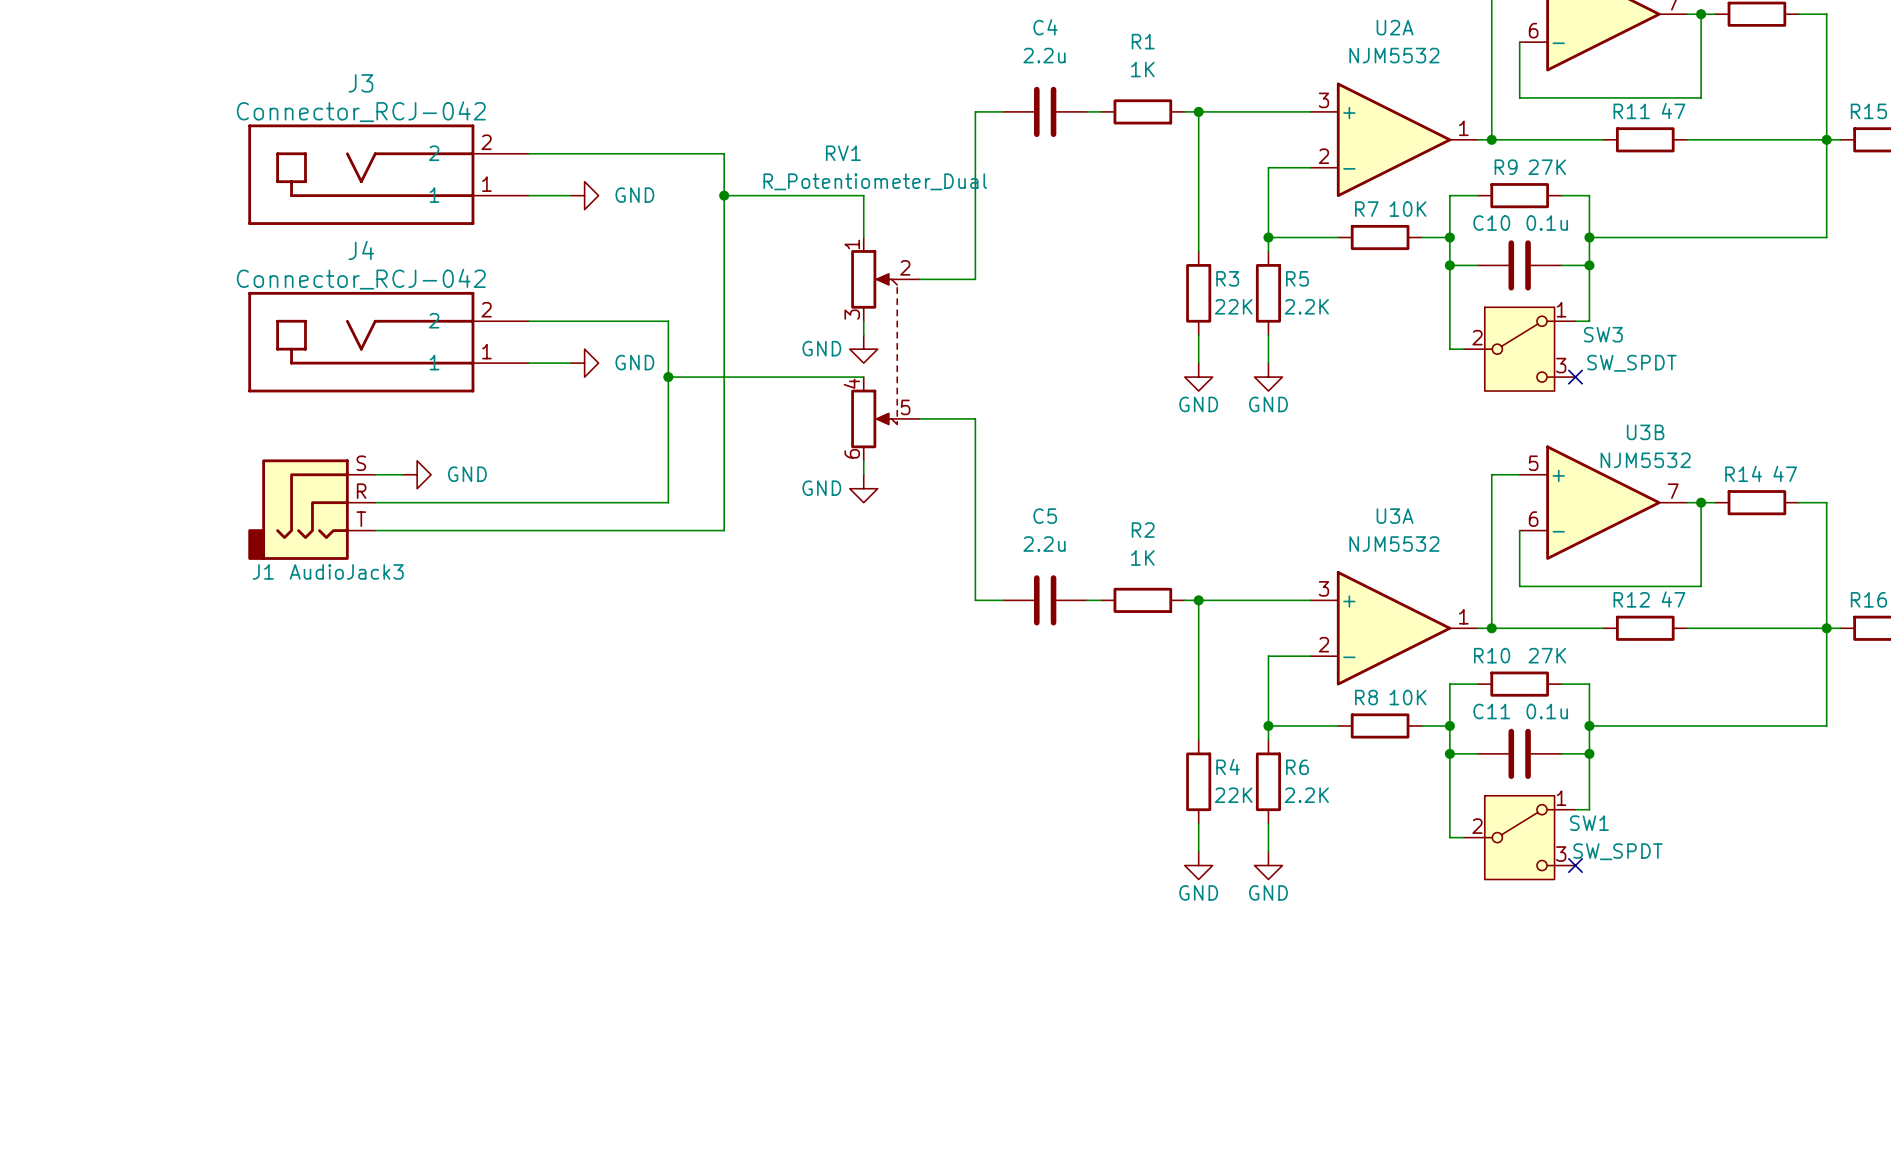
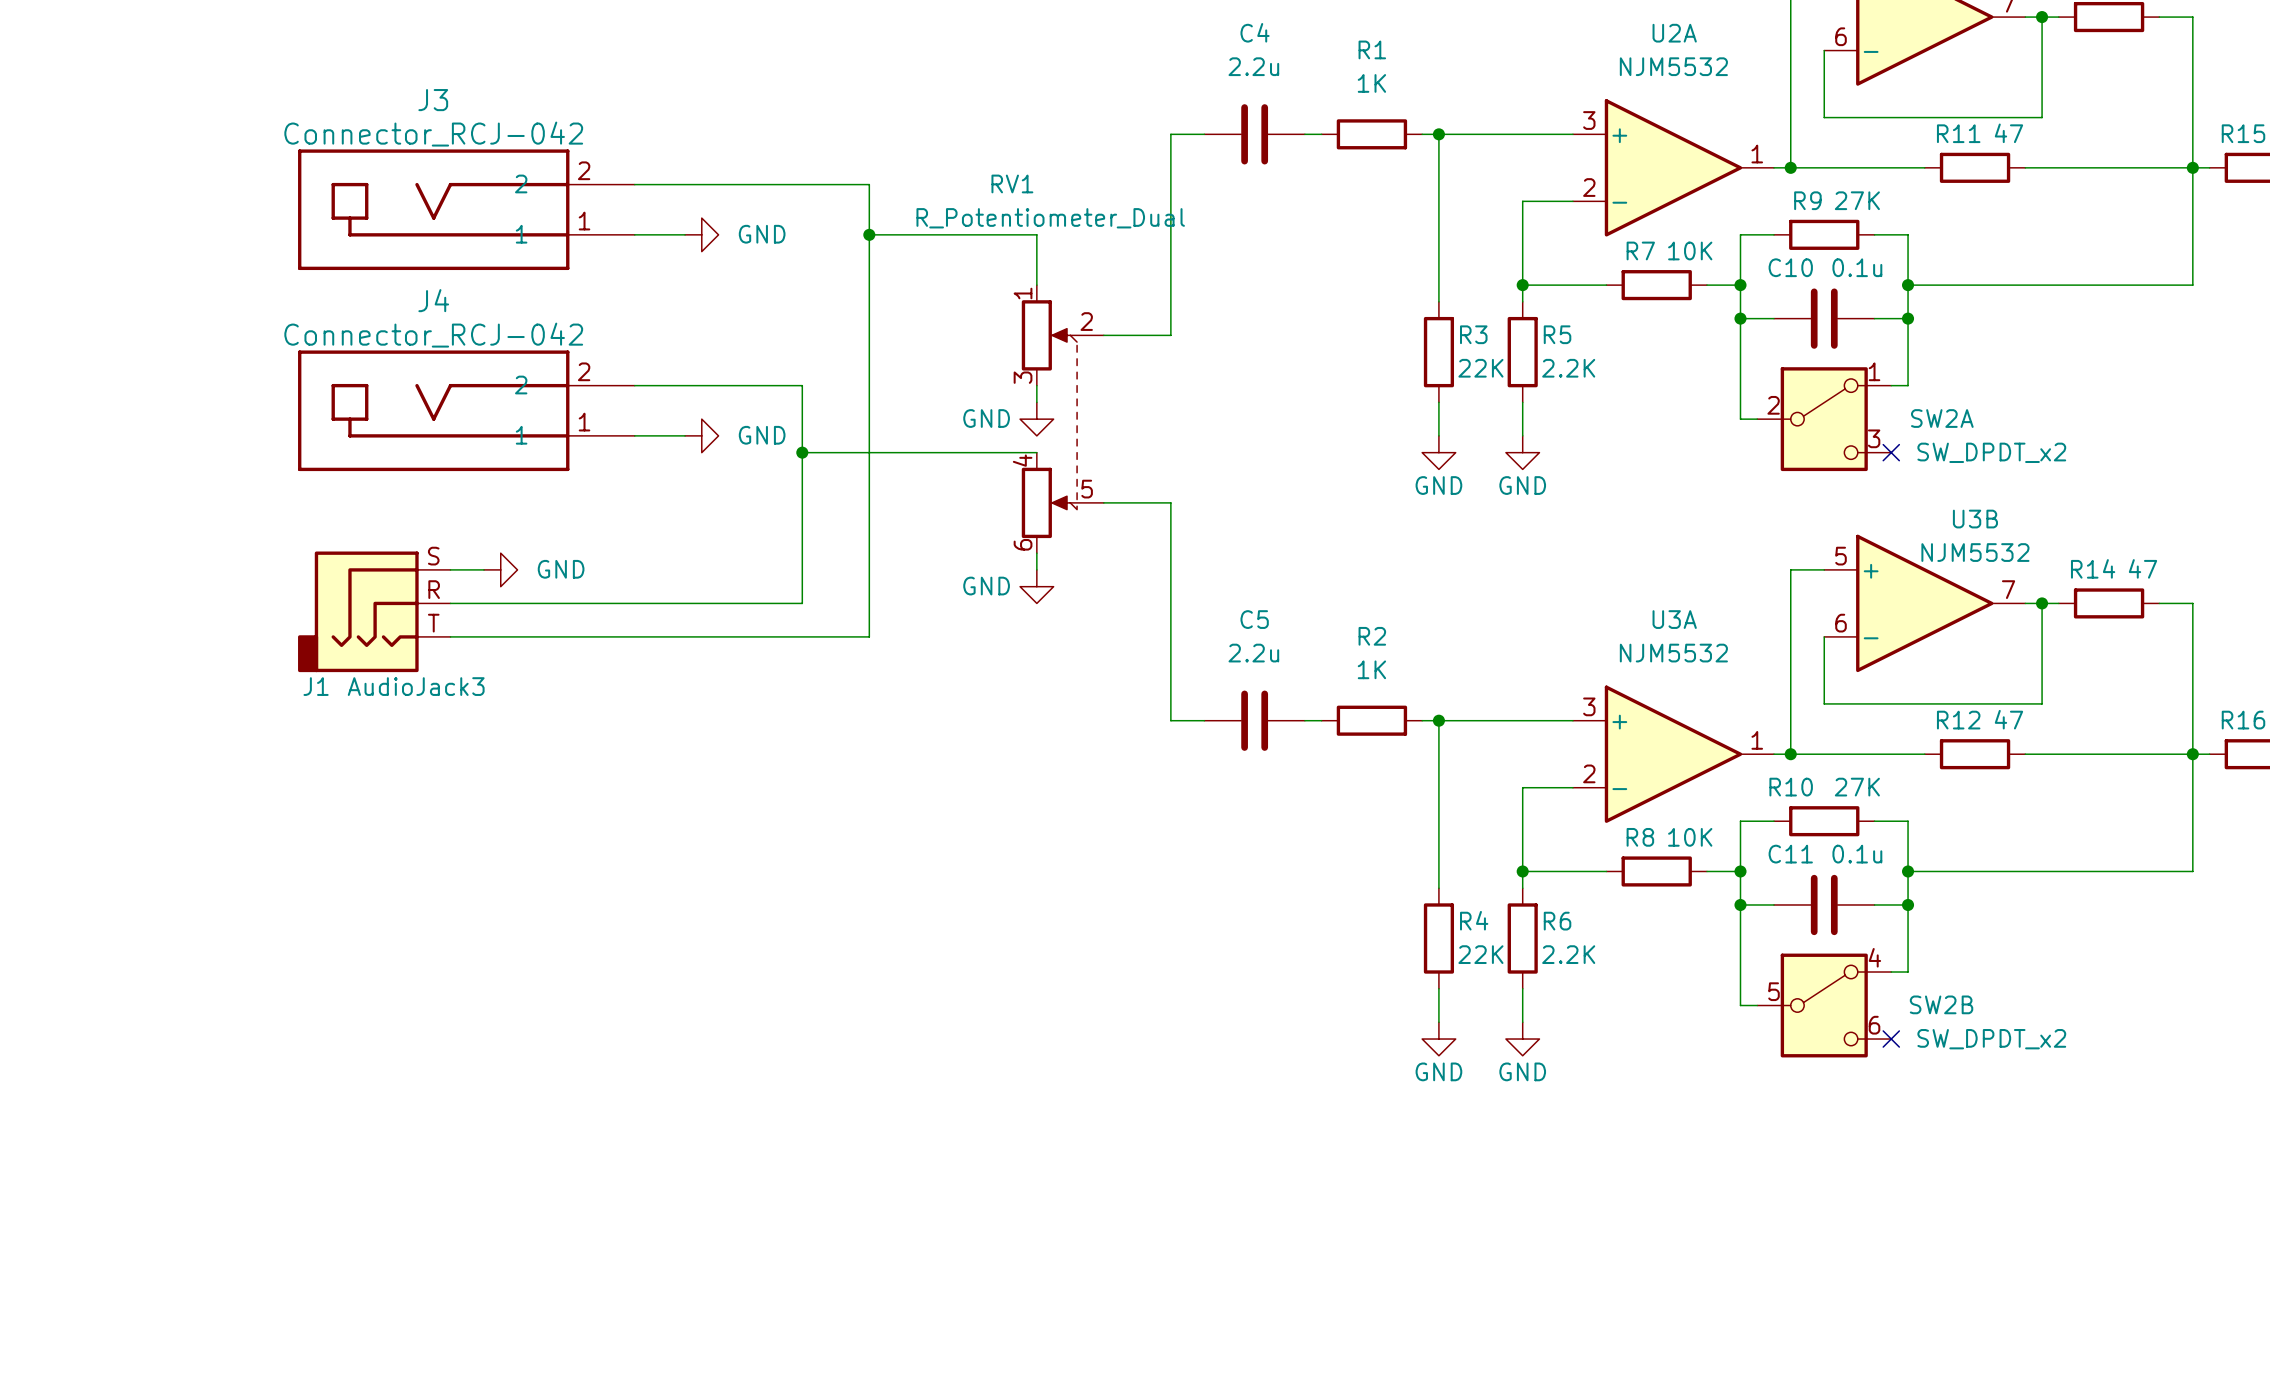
SW3: SW_SPDT (1519, 349) -> none
SW2A: none -> SW_DPDT_x2 (1824, 419)
SW1: SW_SPDT (1519, 837) -> none
SW2B: none -> SW_DPDT_x2 (1824, 1005)

